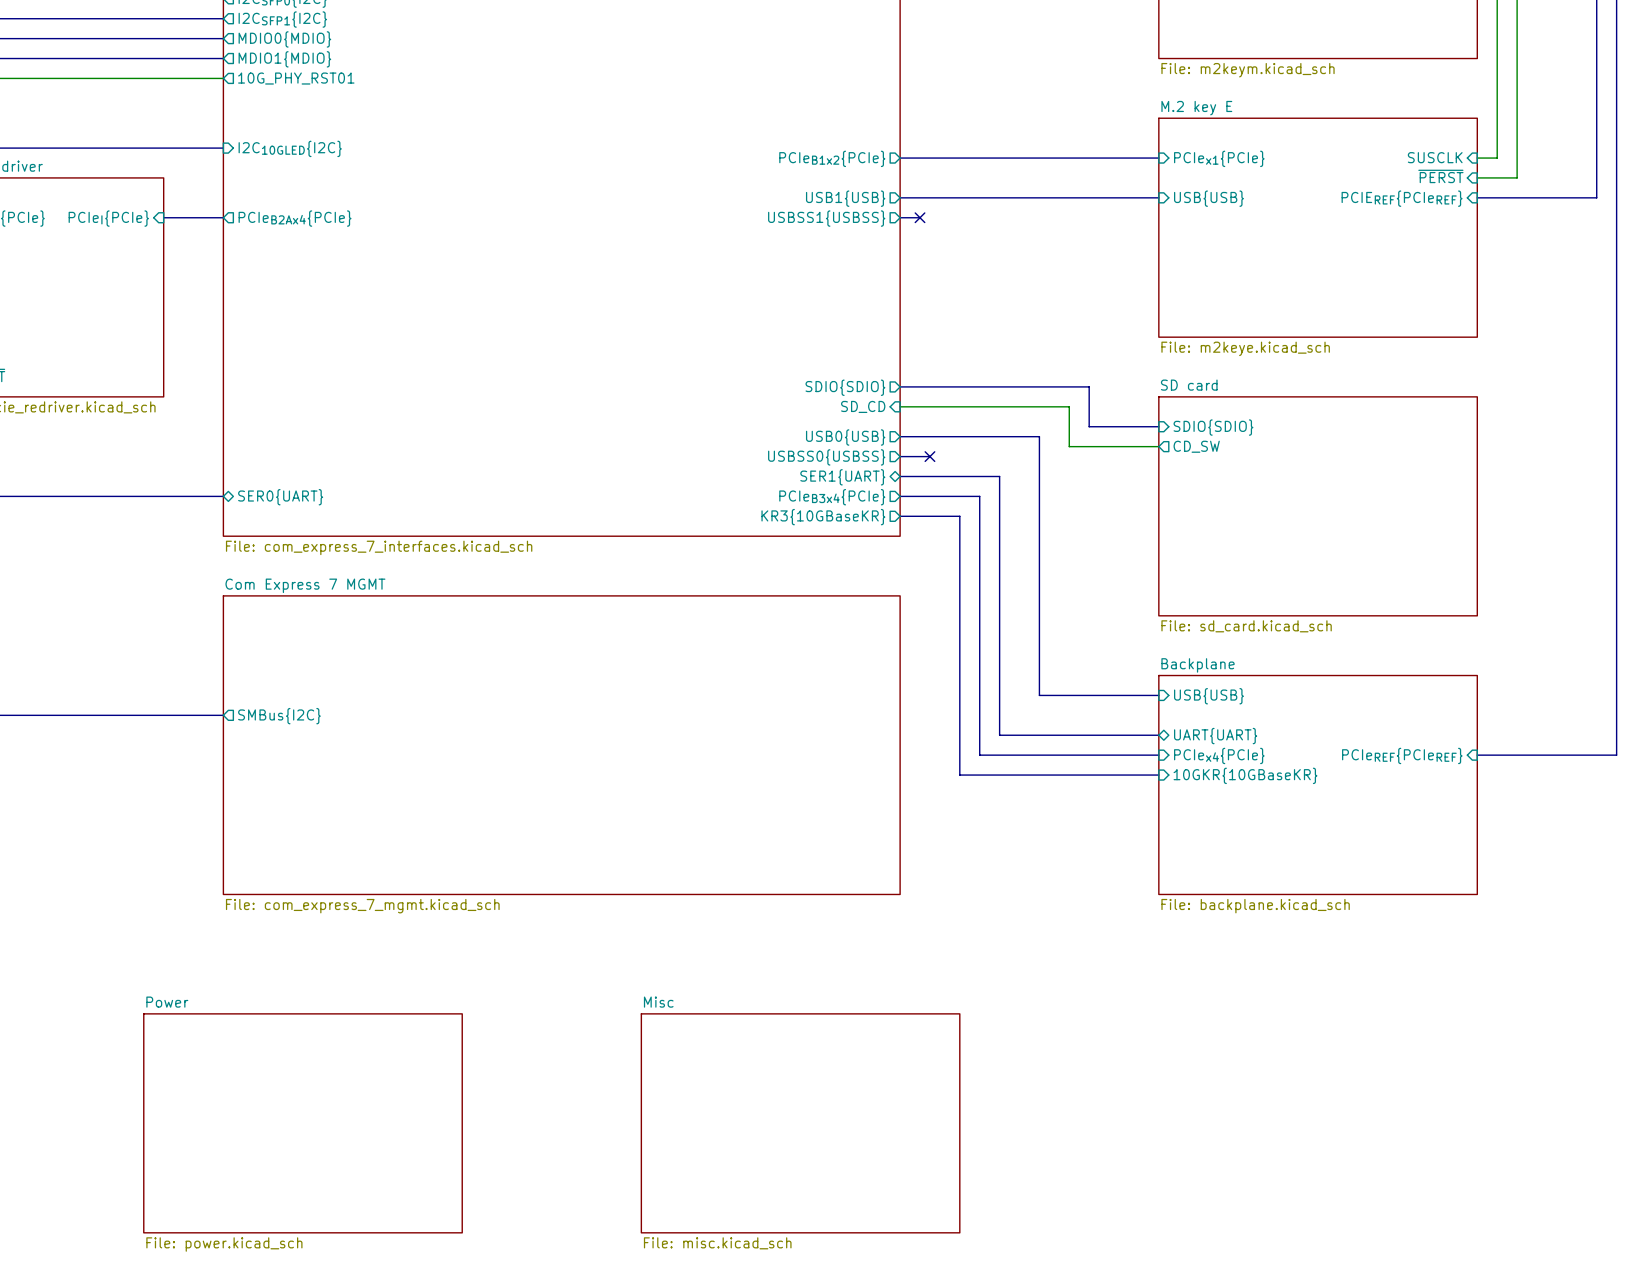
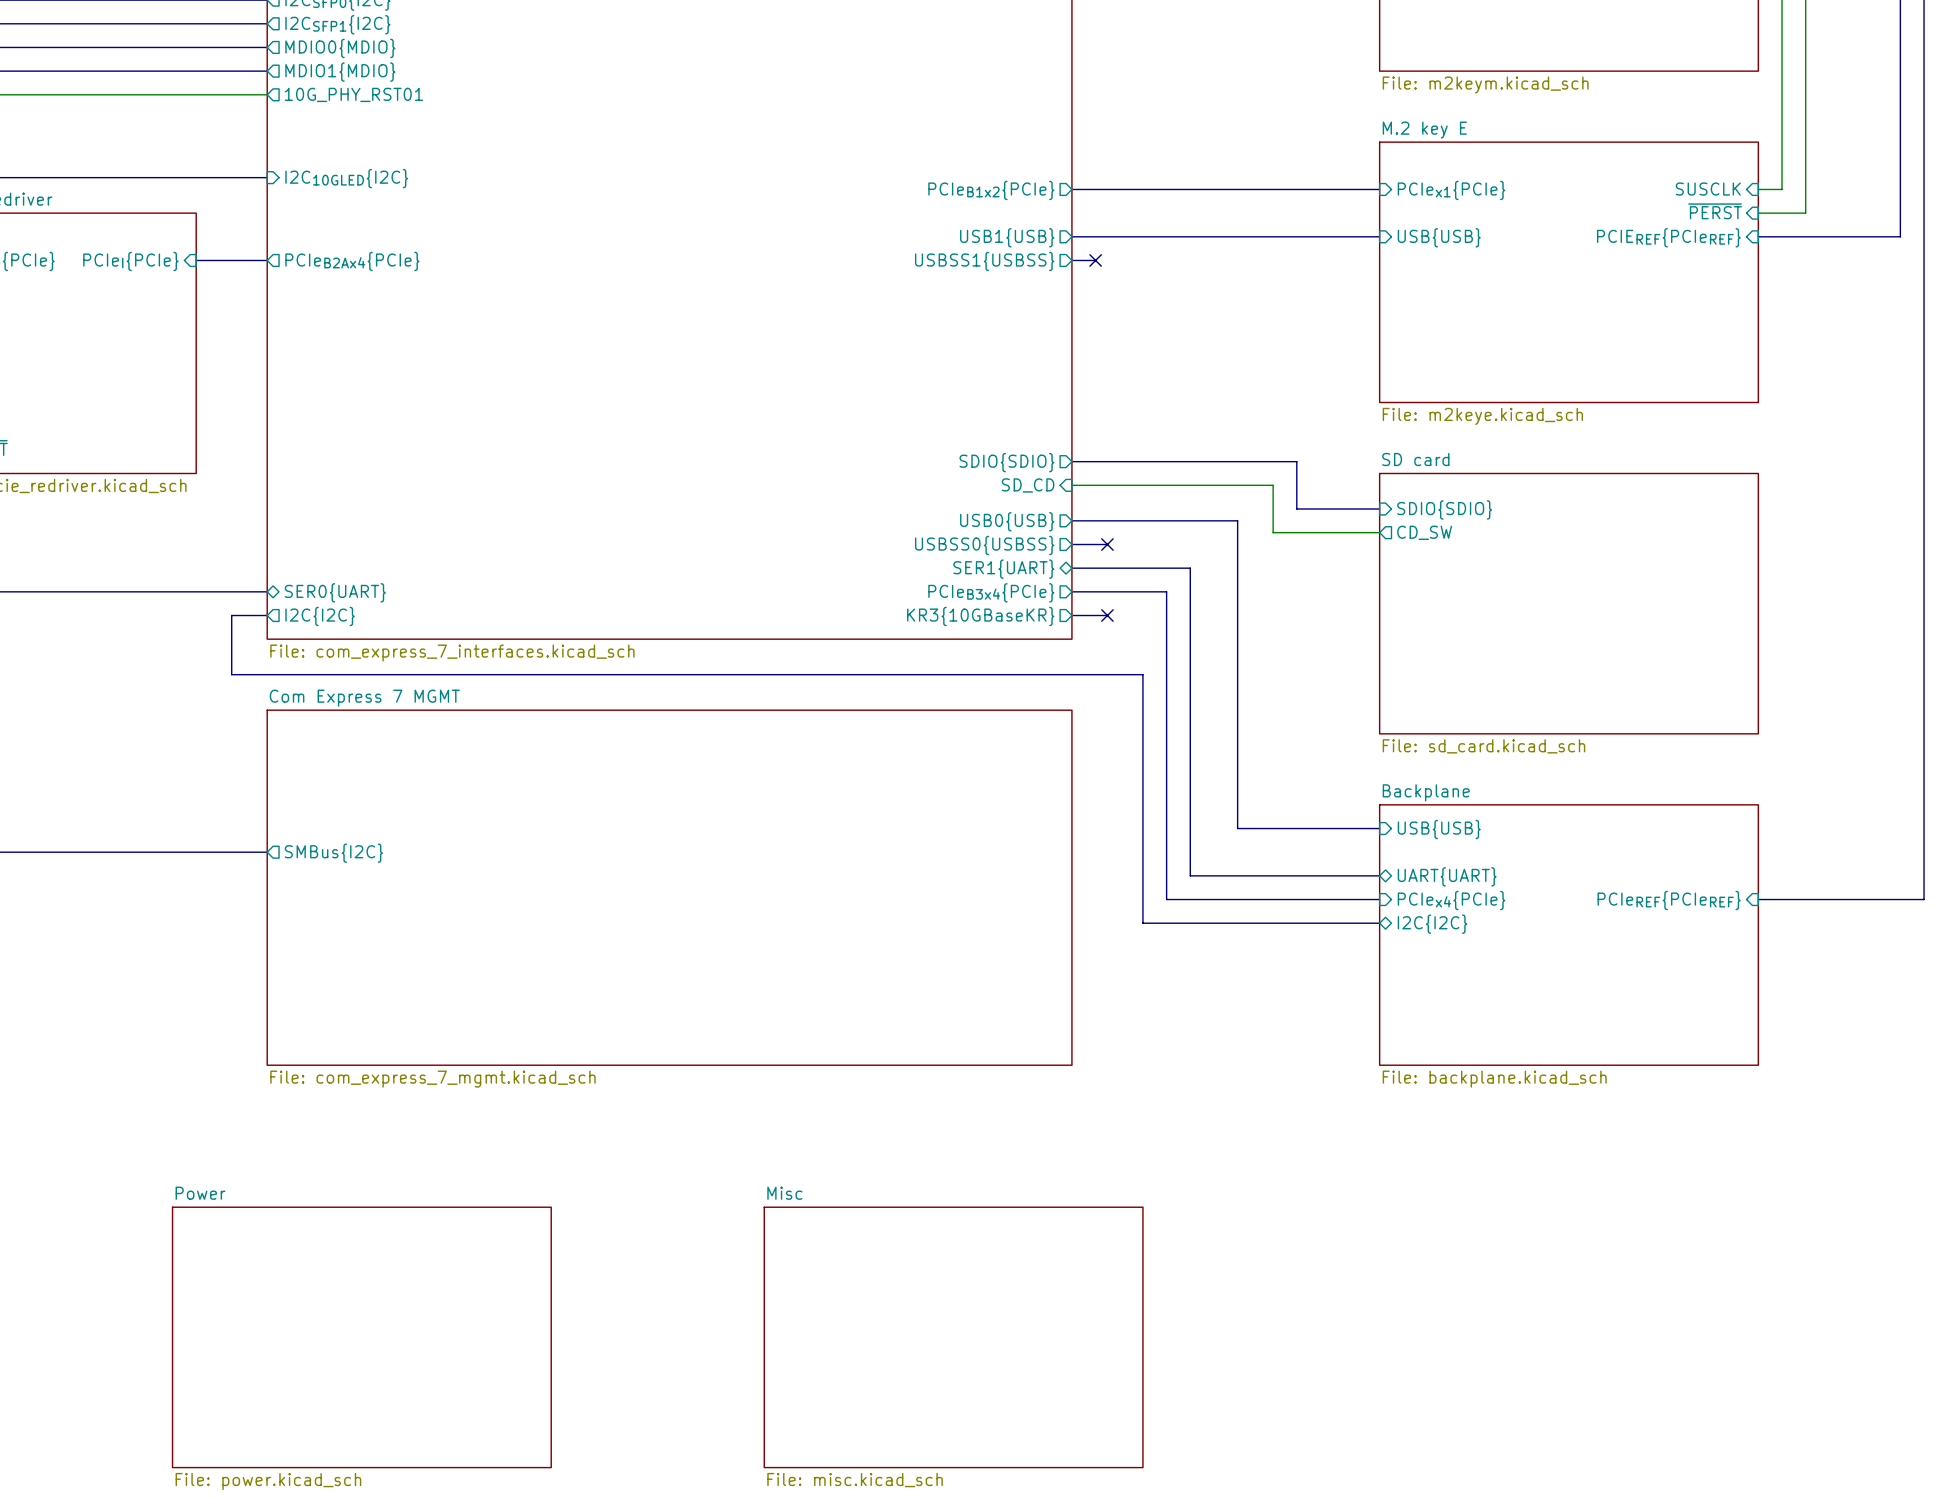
bus: (929, 516) (959, 516) (959, 566) -> (267, 615) (231, 615) (231, 674) (1142, 674)
no-connect mark: none -> (1107, 615)
sheet pin: none -> I2C{I2C} (320, 616)
sheet pin shape: input (1245, 775) -> bidirectional (1432, 924)
sheet pin: 10GKR{10GBaseKR} (1245, 775) -> I2C{I2C} (1432, 924)

